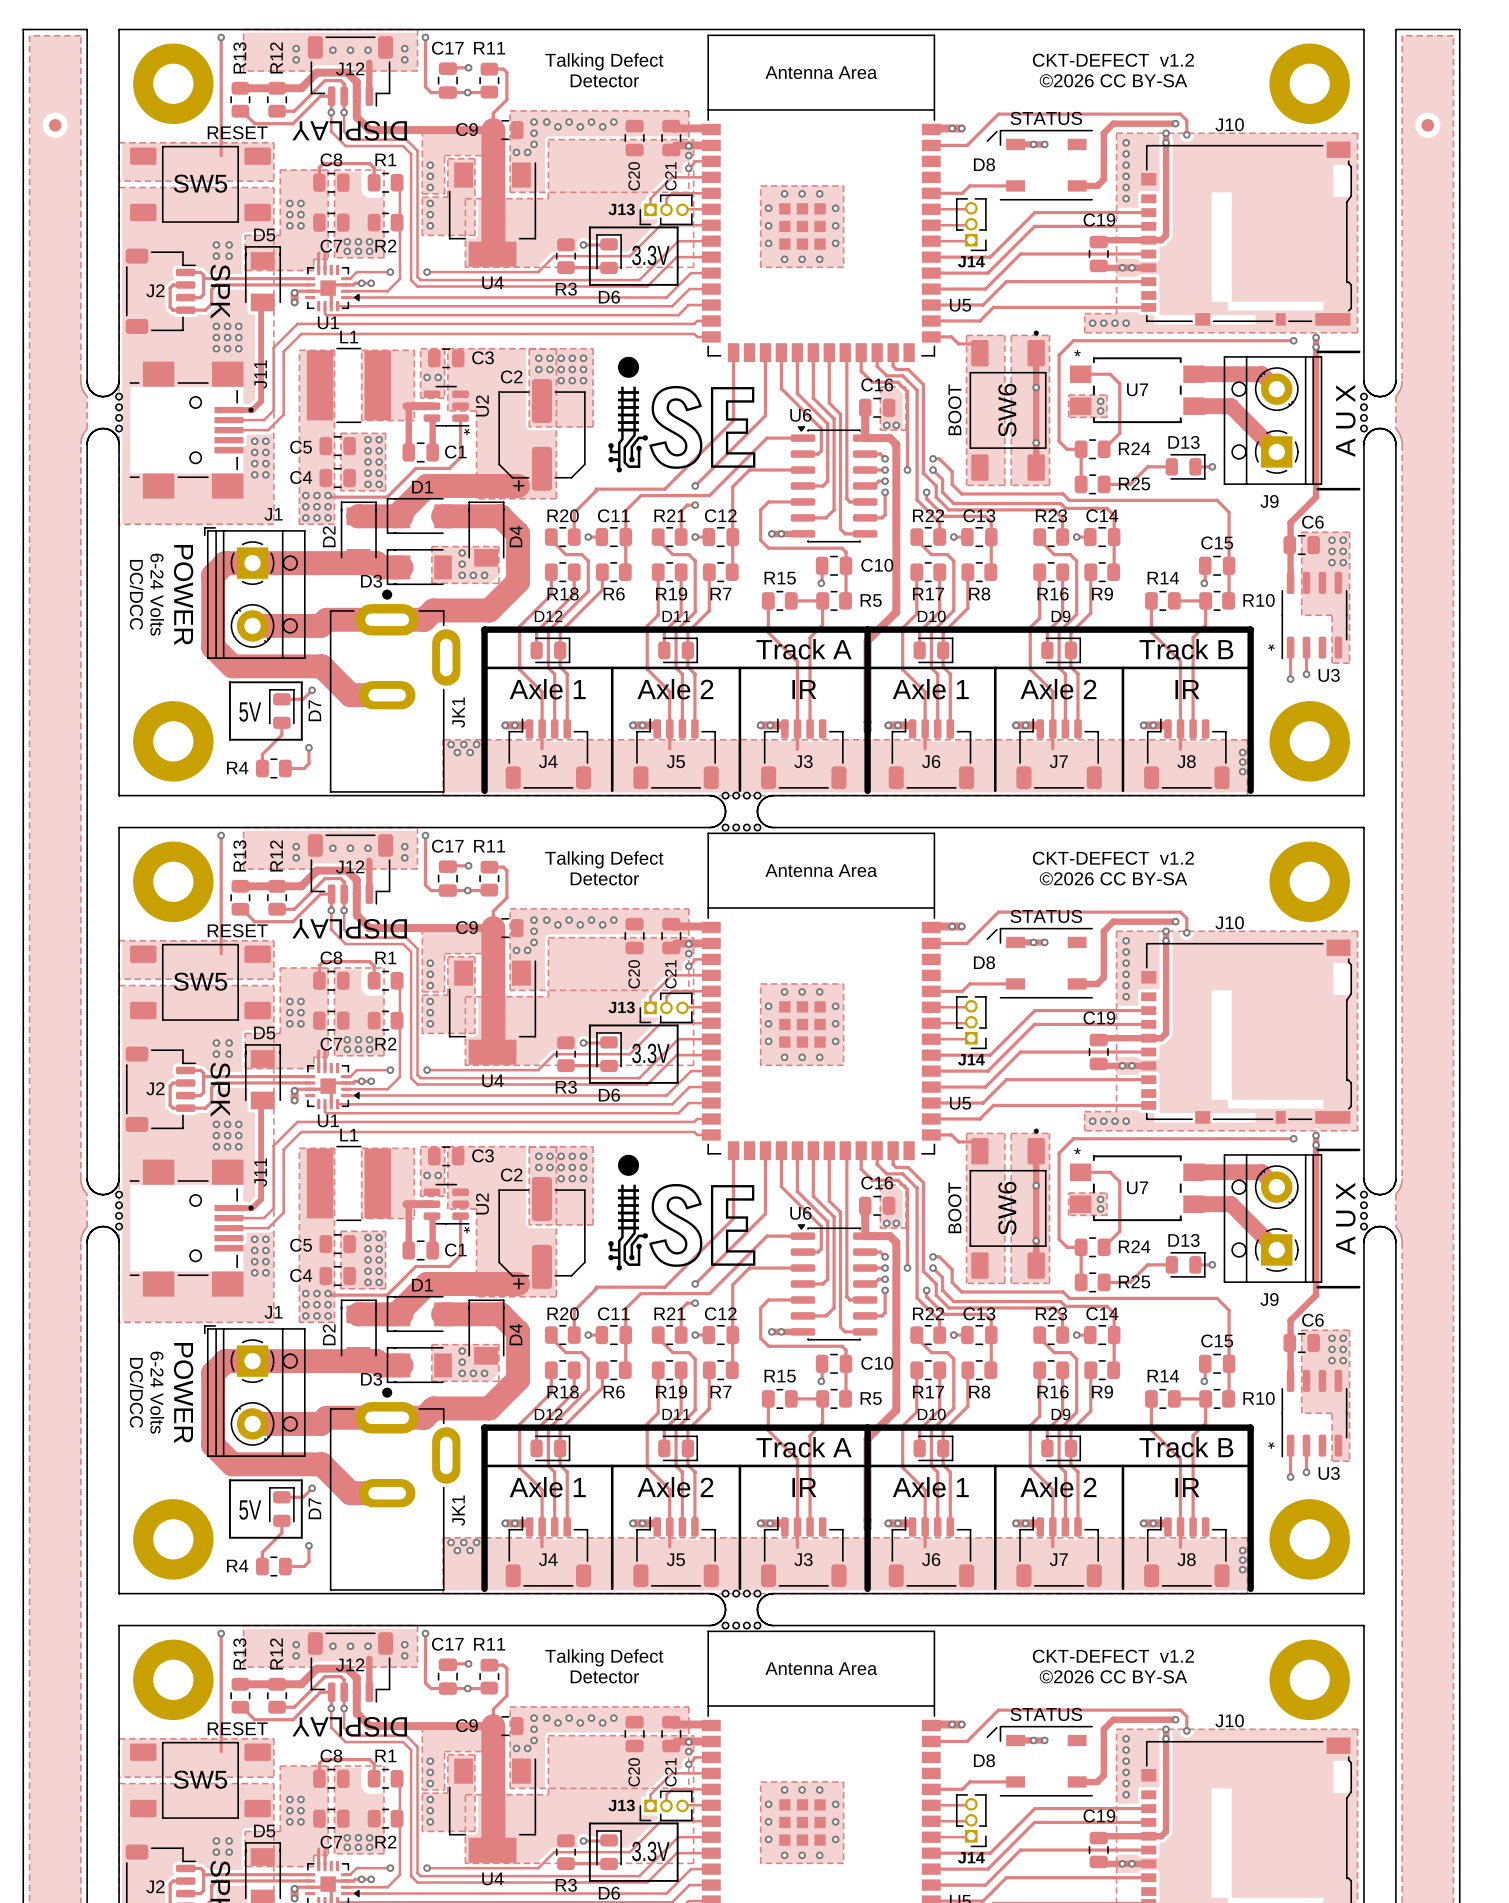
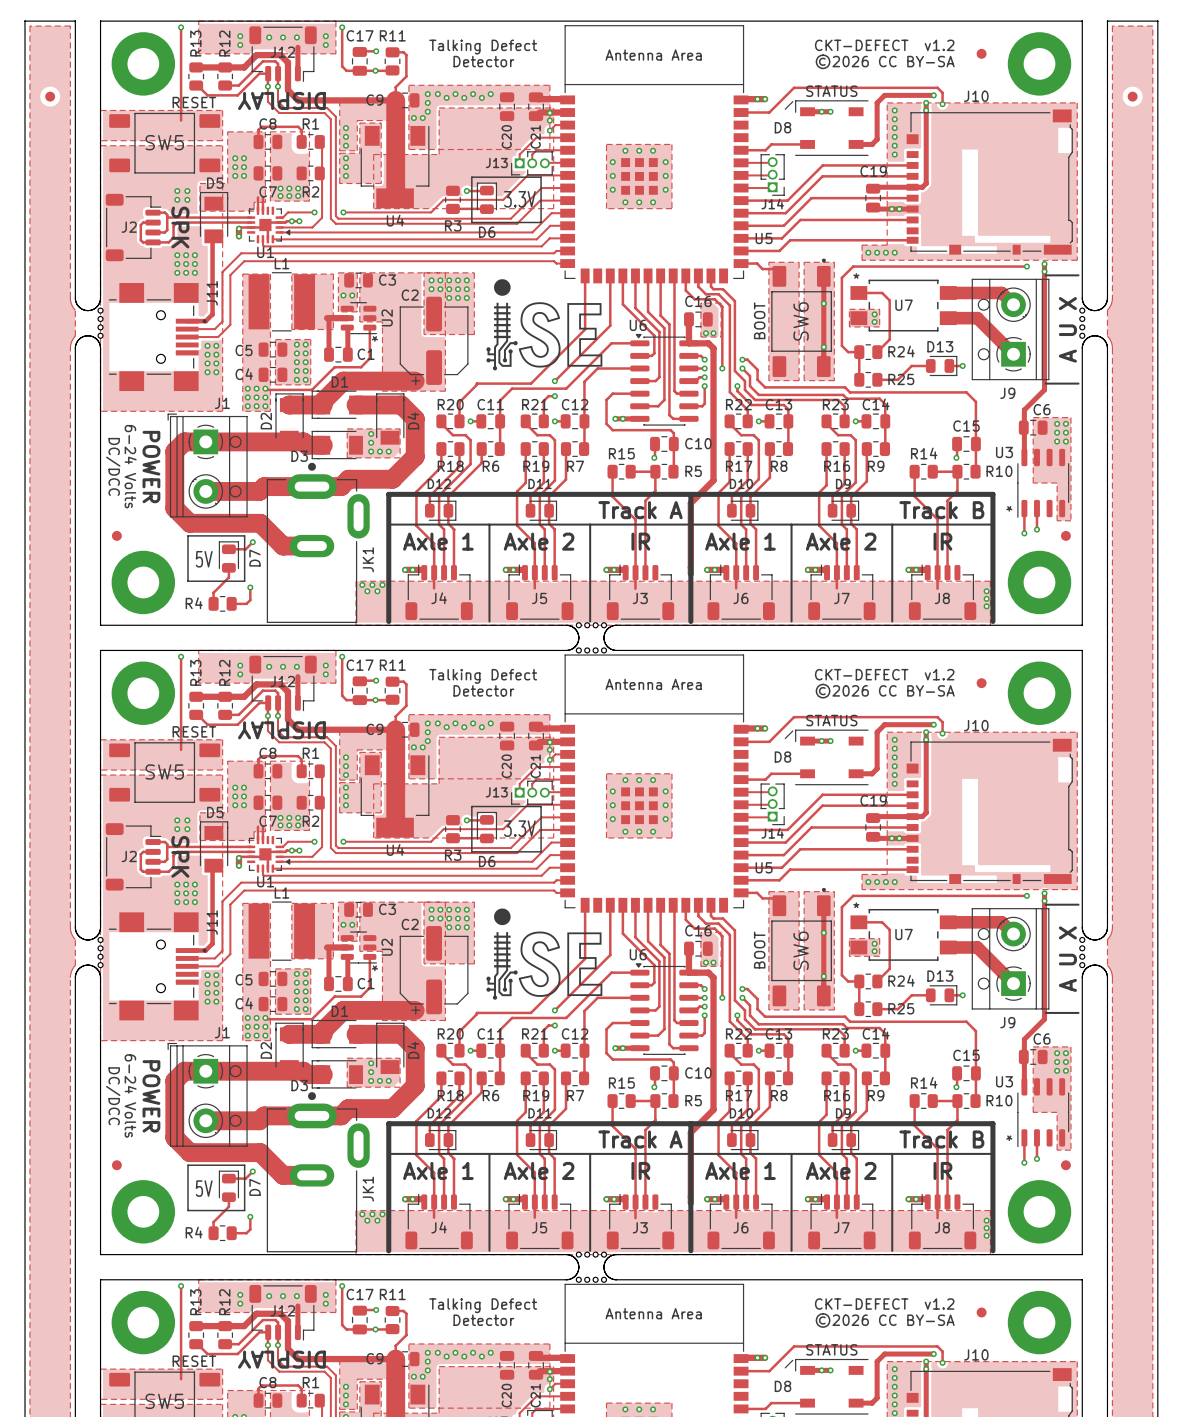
part: none -> (981, 53)
U3 name position: U3 (1329, 675) -> U3 (1004, 452)
part: none -> (116, 535)
part: none -> (1065, 535)
part: none -> (981, 683)
U3 name position: U3 (1329, 1473) -> U3 (1004, 1081)
part: none -> (116, 1165)
part: none -> (1065, 1165)
part: none -> (981, 1312)

